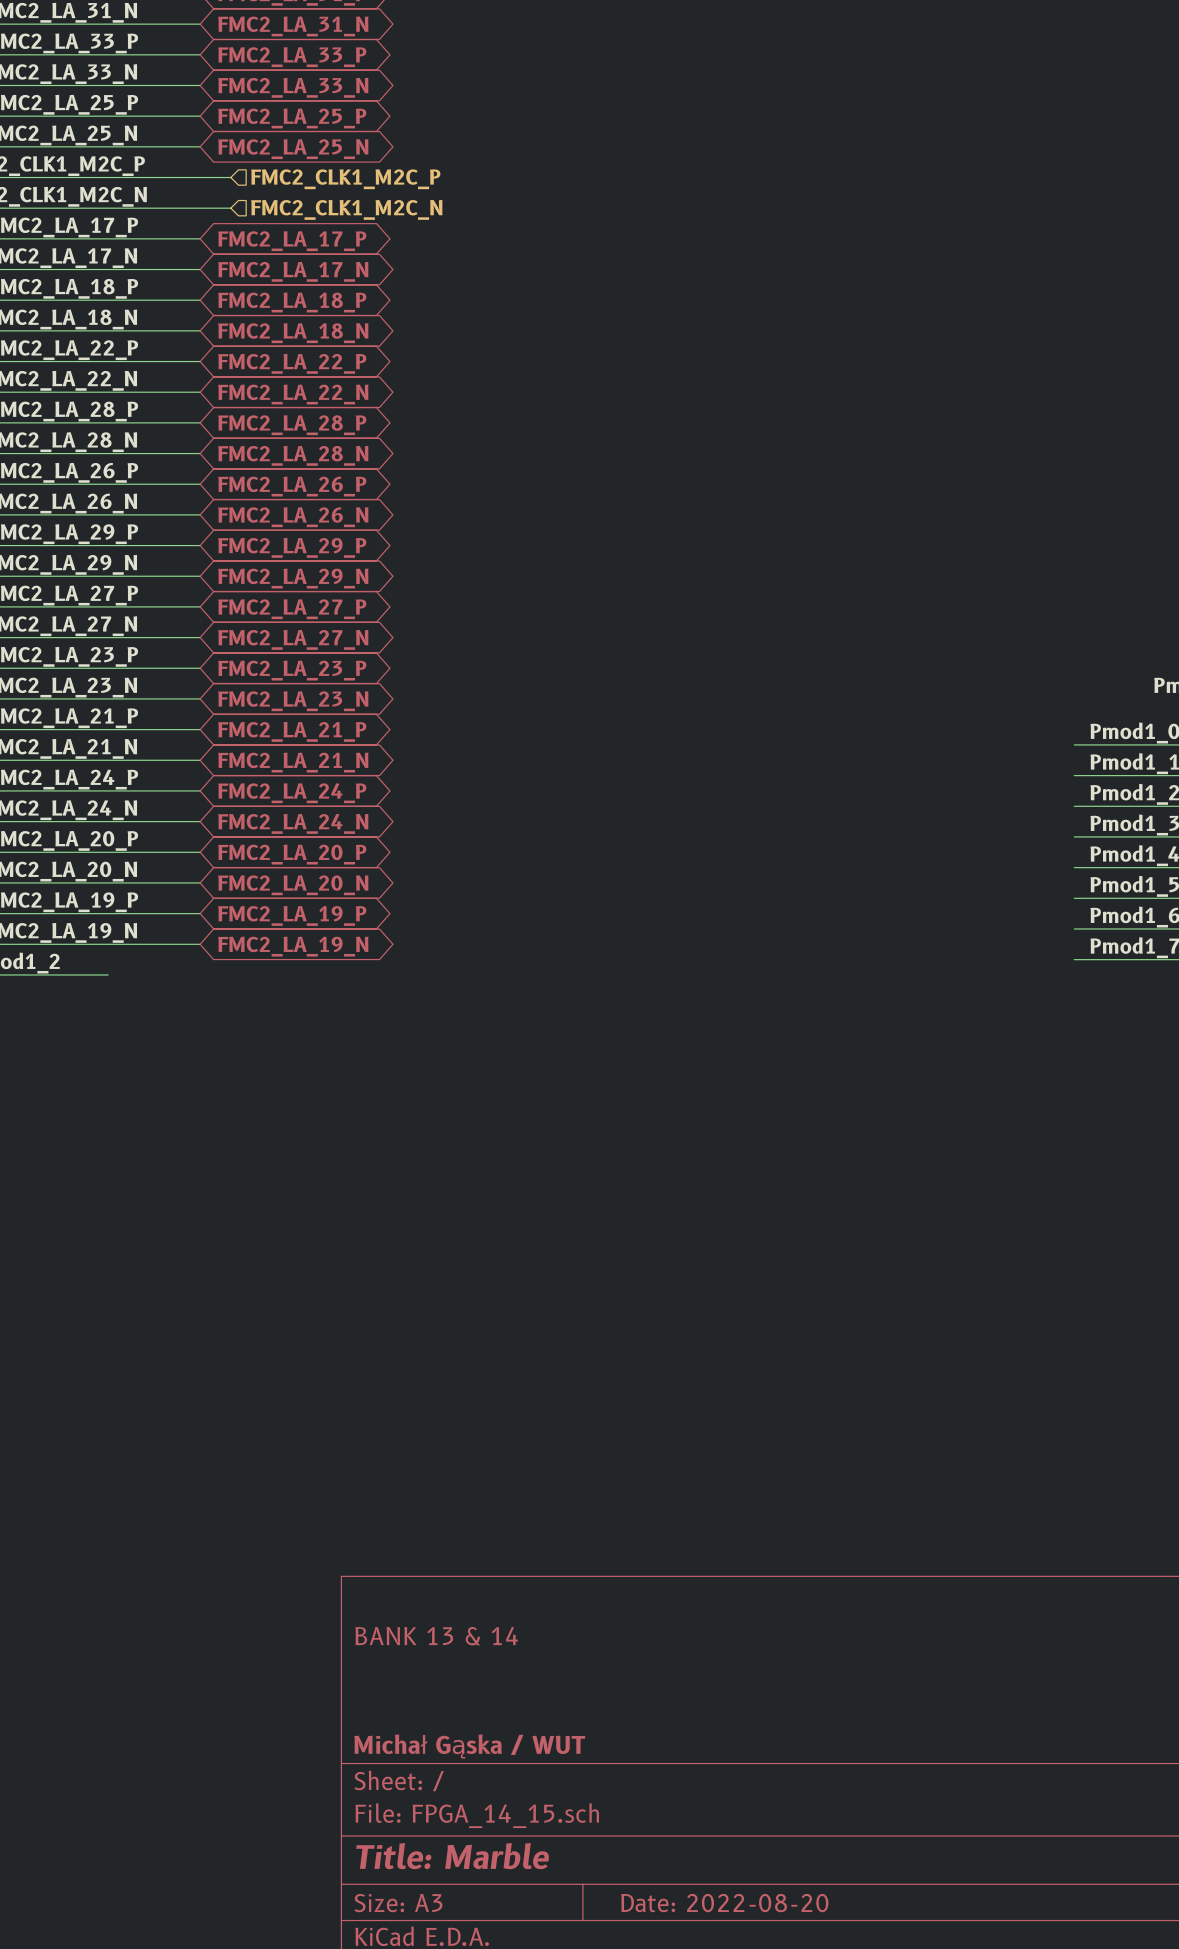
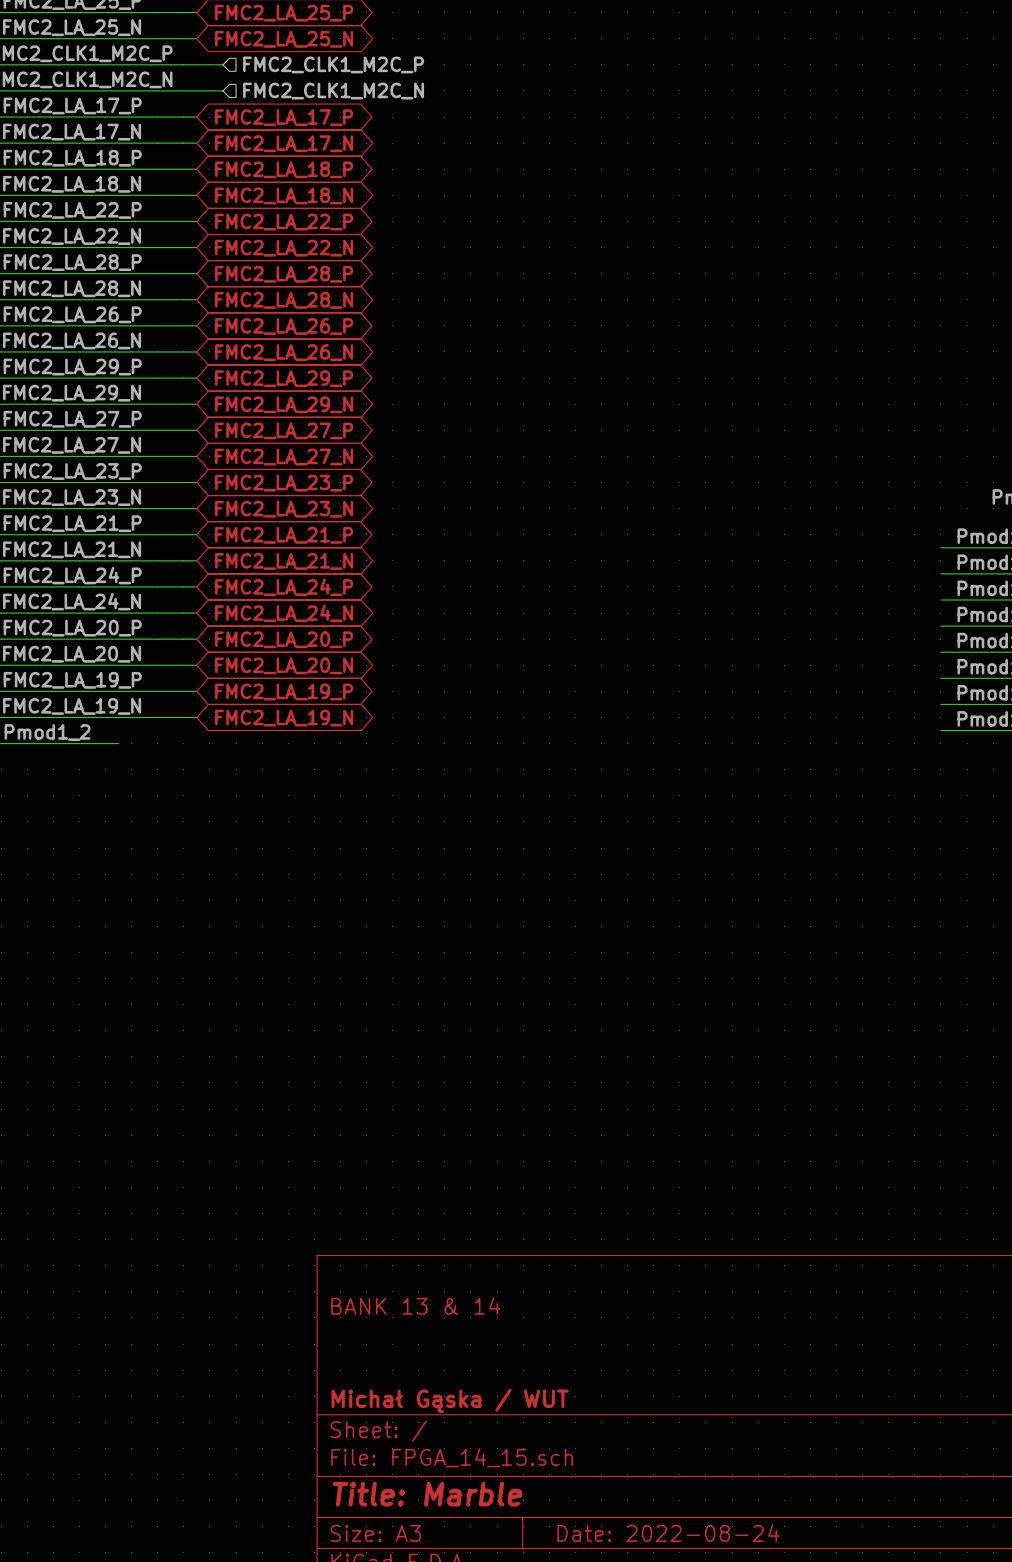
title block: Date: 2022-08-20 (724, 1903) -> Date: 2022-08-24 (668, 1533)

